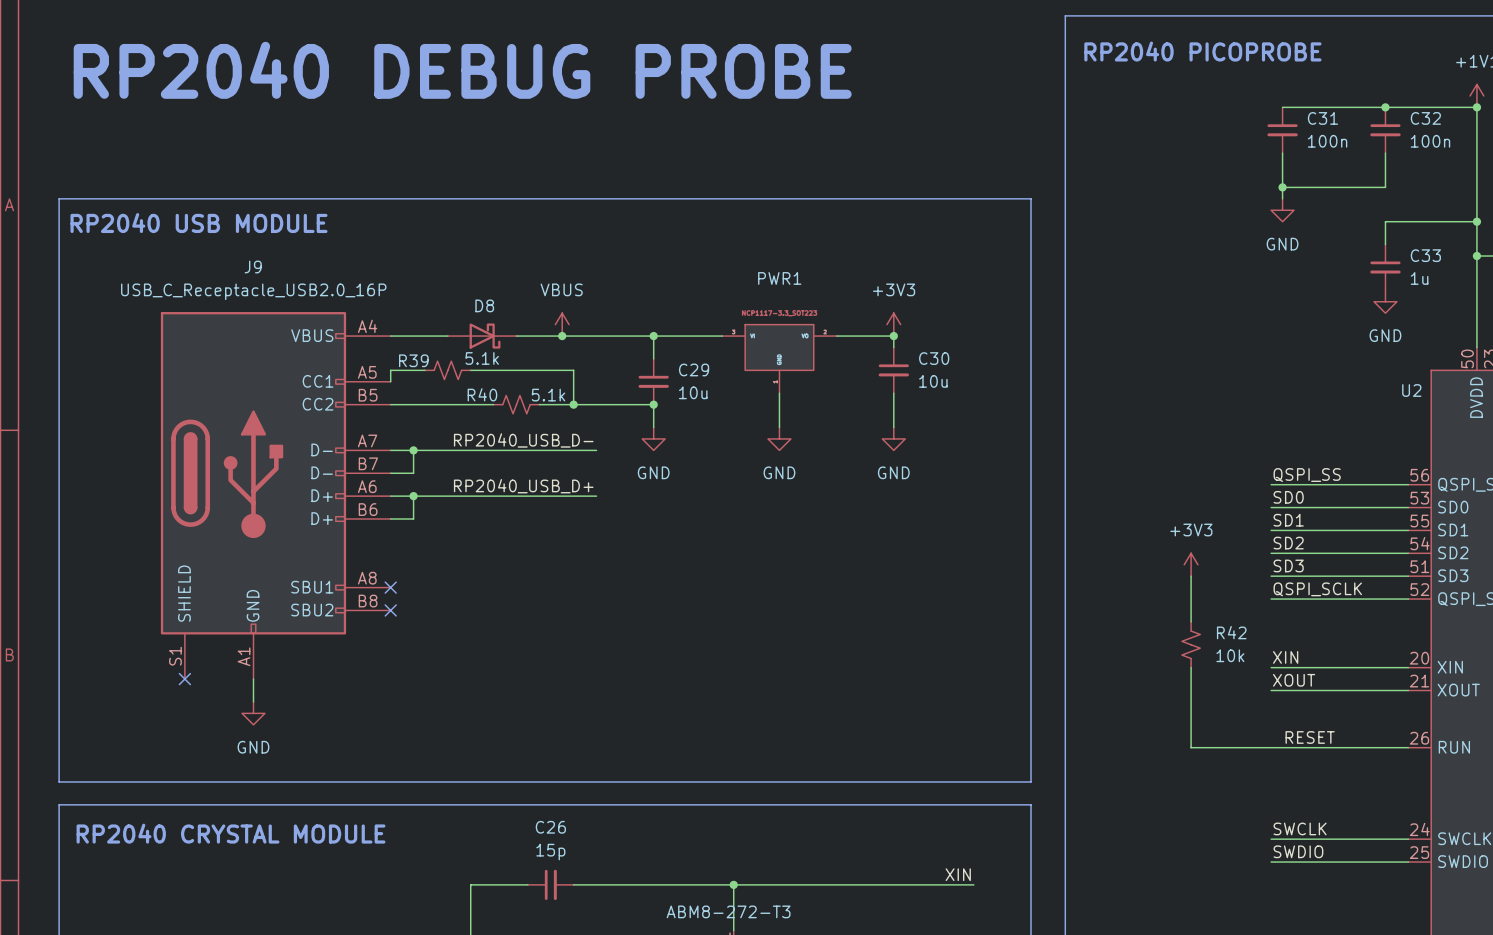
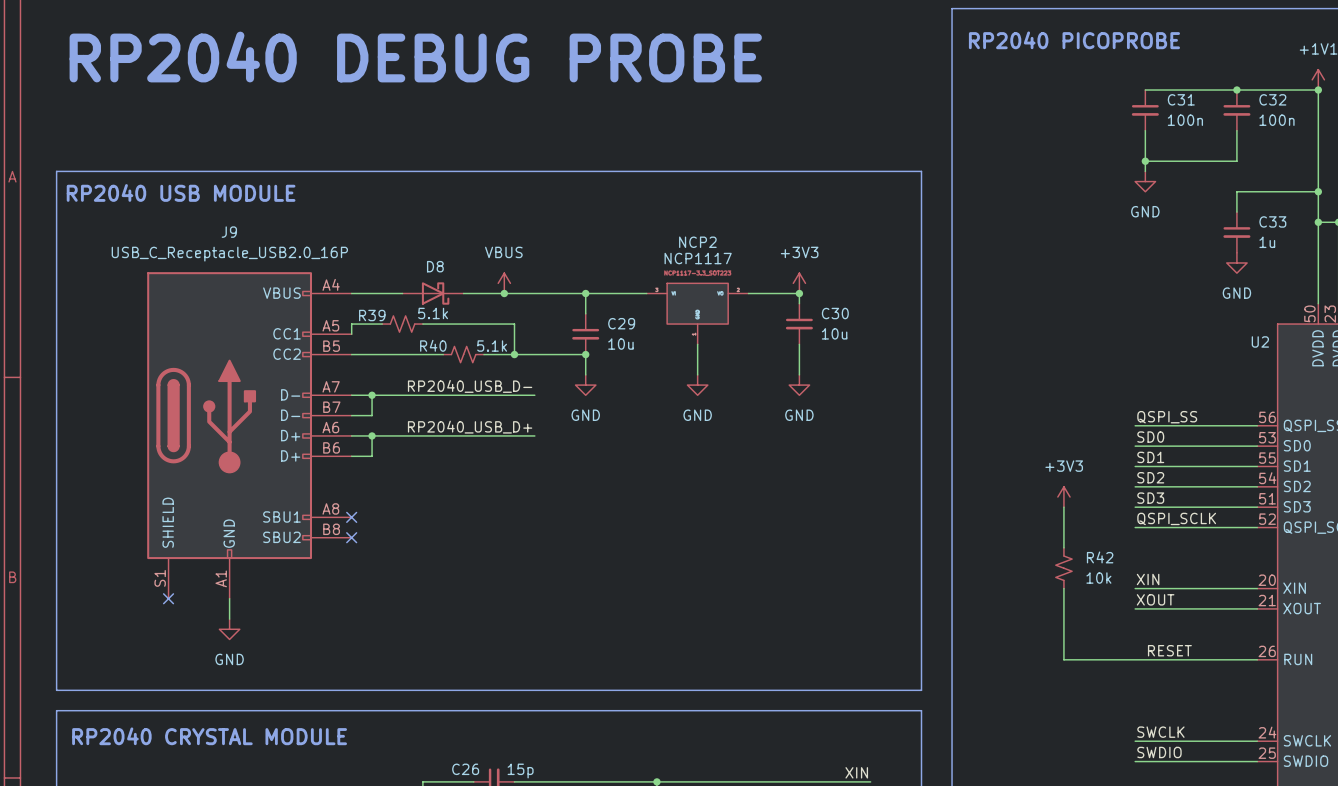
PWR1 name: PWR1 (779, 278) -> NCP2 (697, 242)
PWR1 value: none -> NCP1117 (698, 258)
C26 name position: C26 (550, 827) -> C26 (465, 769)
C26 value position: 15p (550, 852) -> 15p (520, 771)

